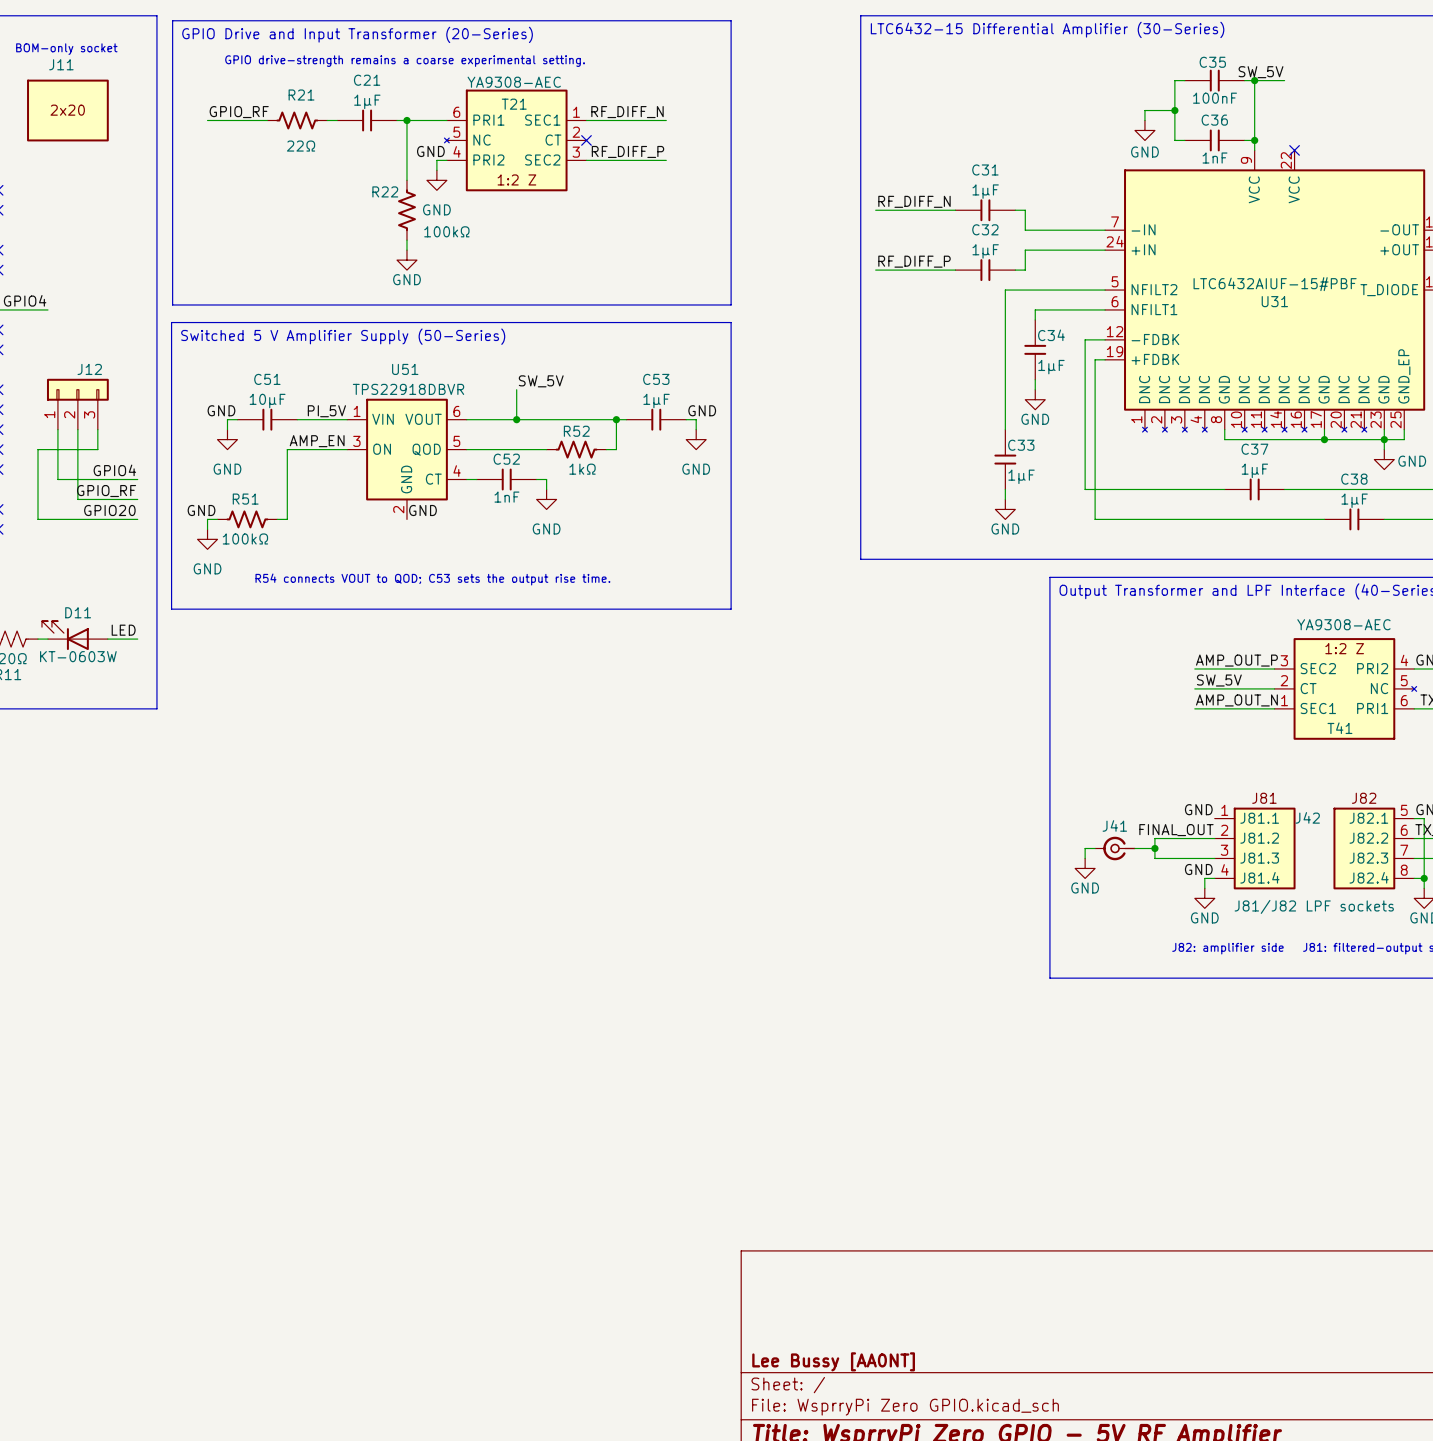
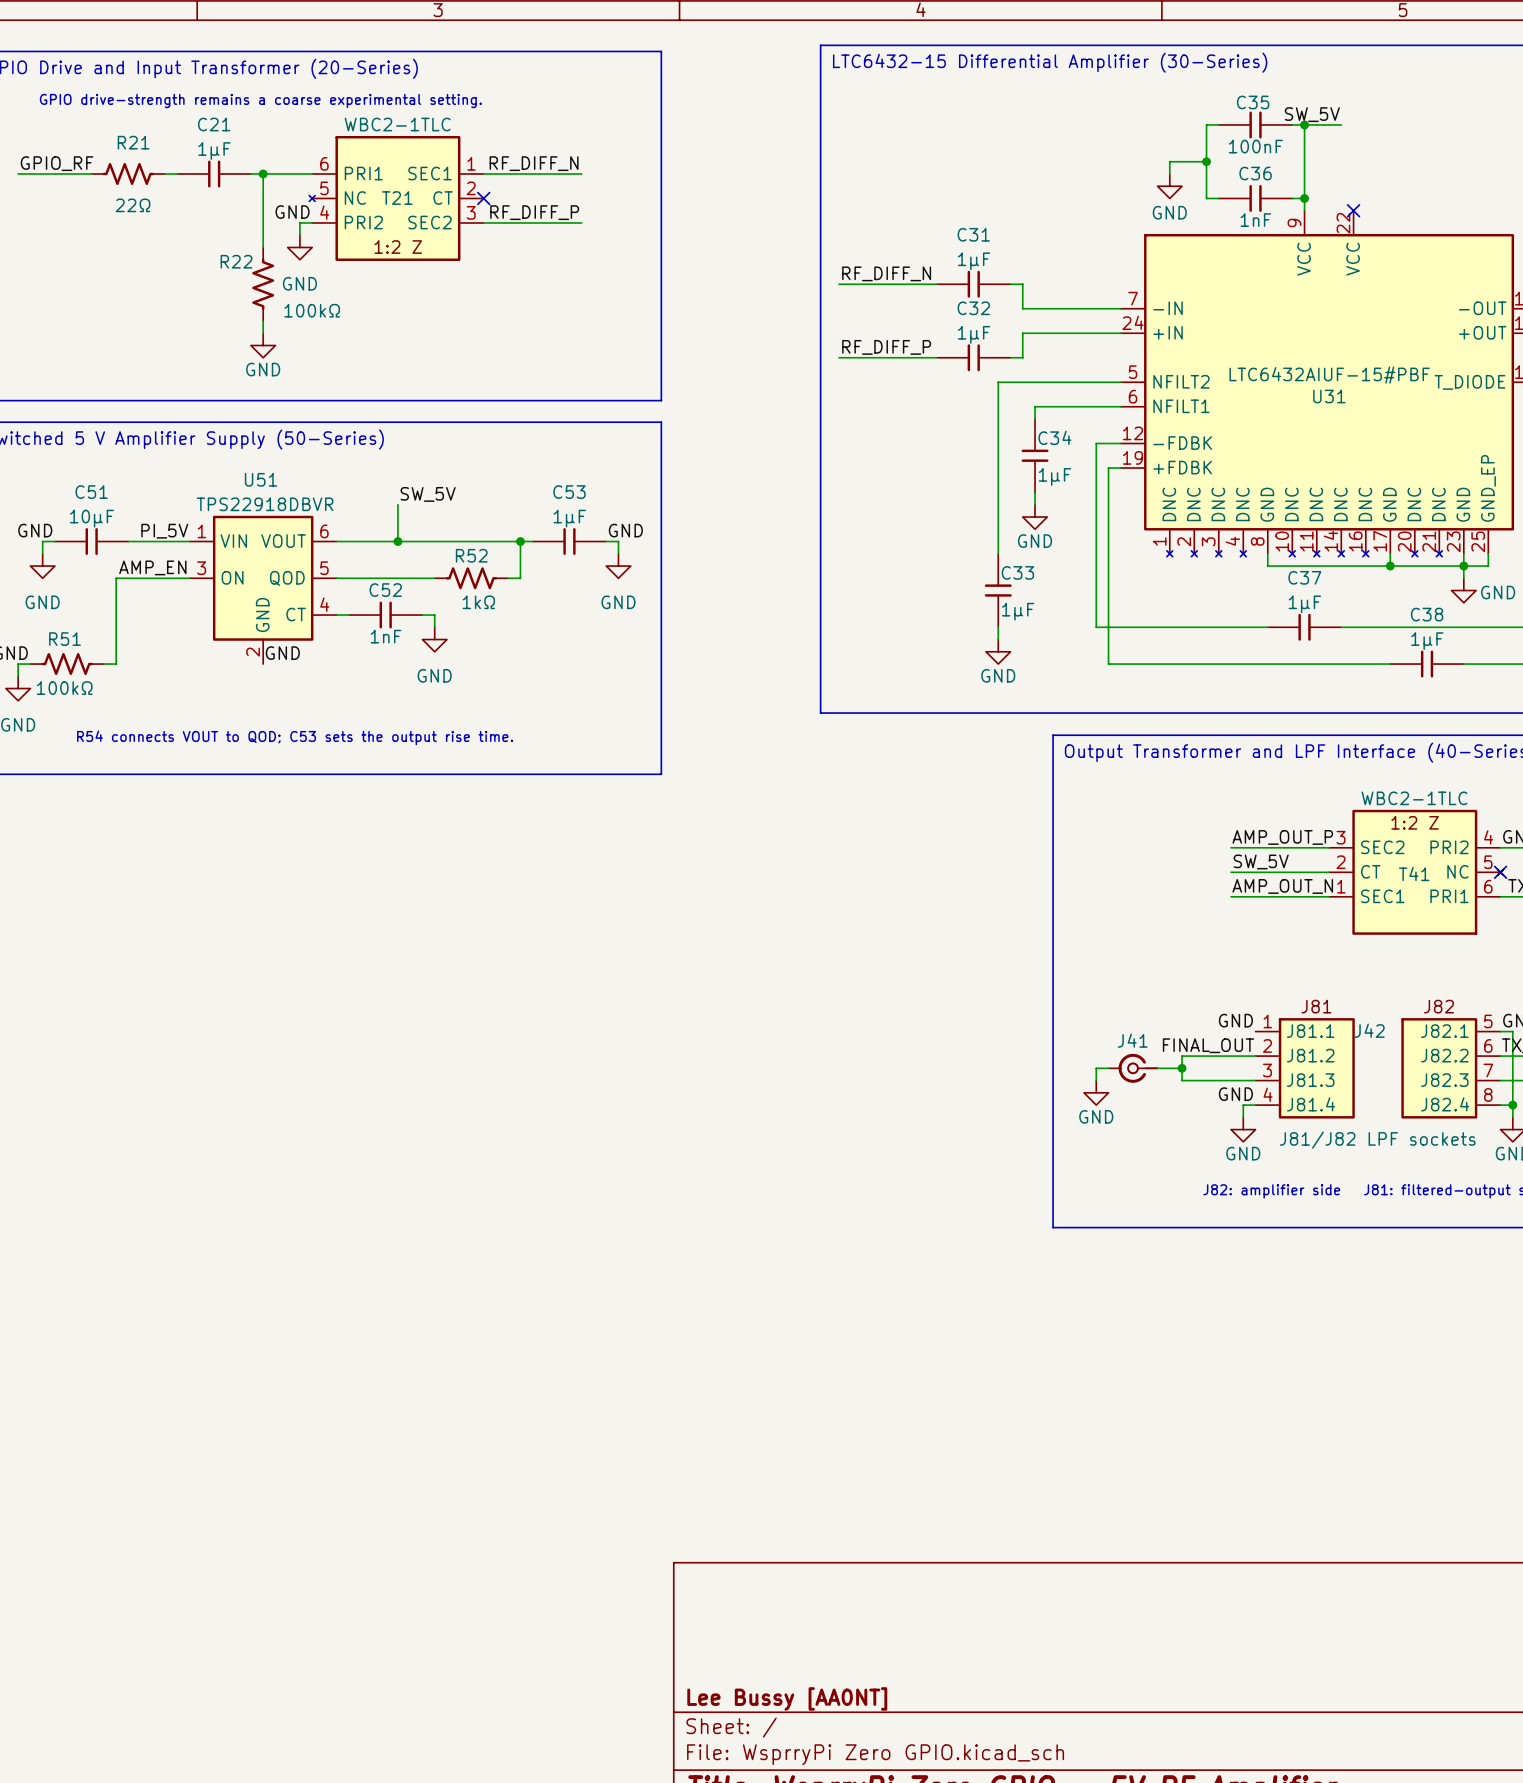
T21 value: YA9308-AEC (514, 82) -> WBC2-1TLC (397, 124)
T21 name position: T21 (514, 104) -> T21 (397, 198)
T41 value: YA9308-AEC (1343, 624) -> WBC2-1TLC (1414, 798)
no-connect mark: none -> (1500, 872)
T41 name position: T41 (1339, 728) -> T41 (1414, 874)

